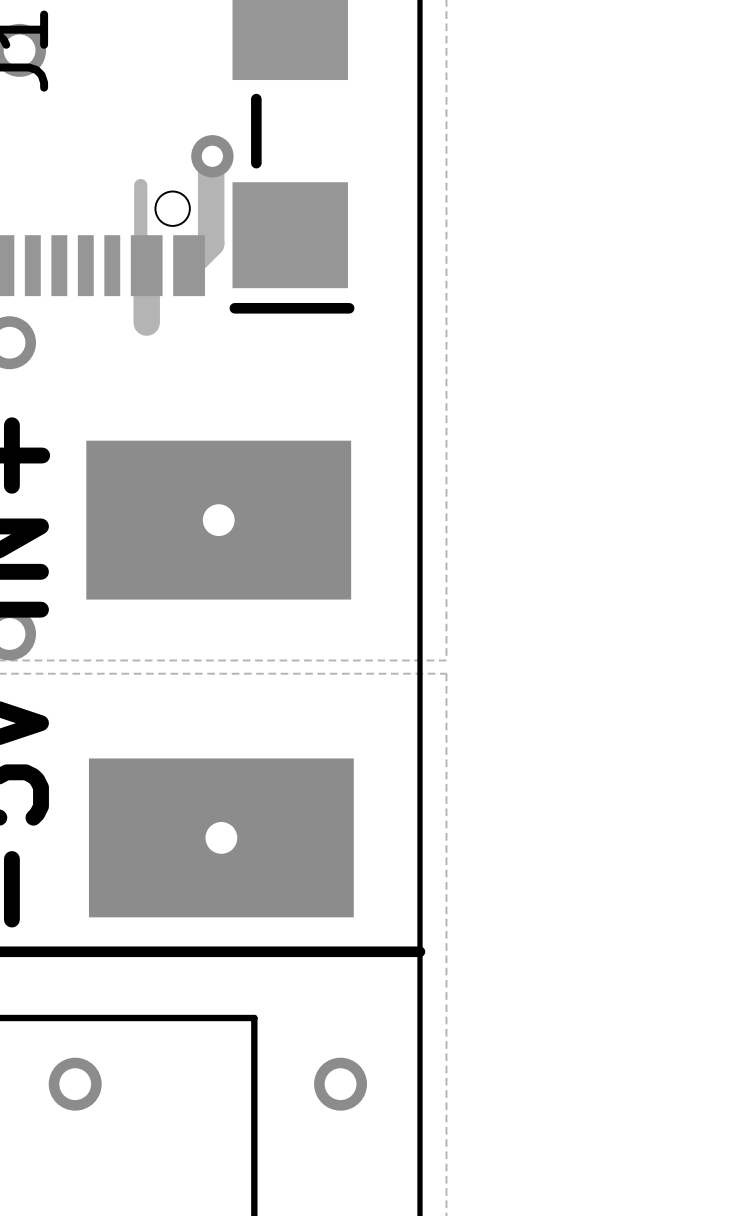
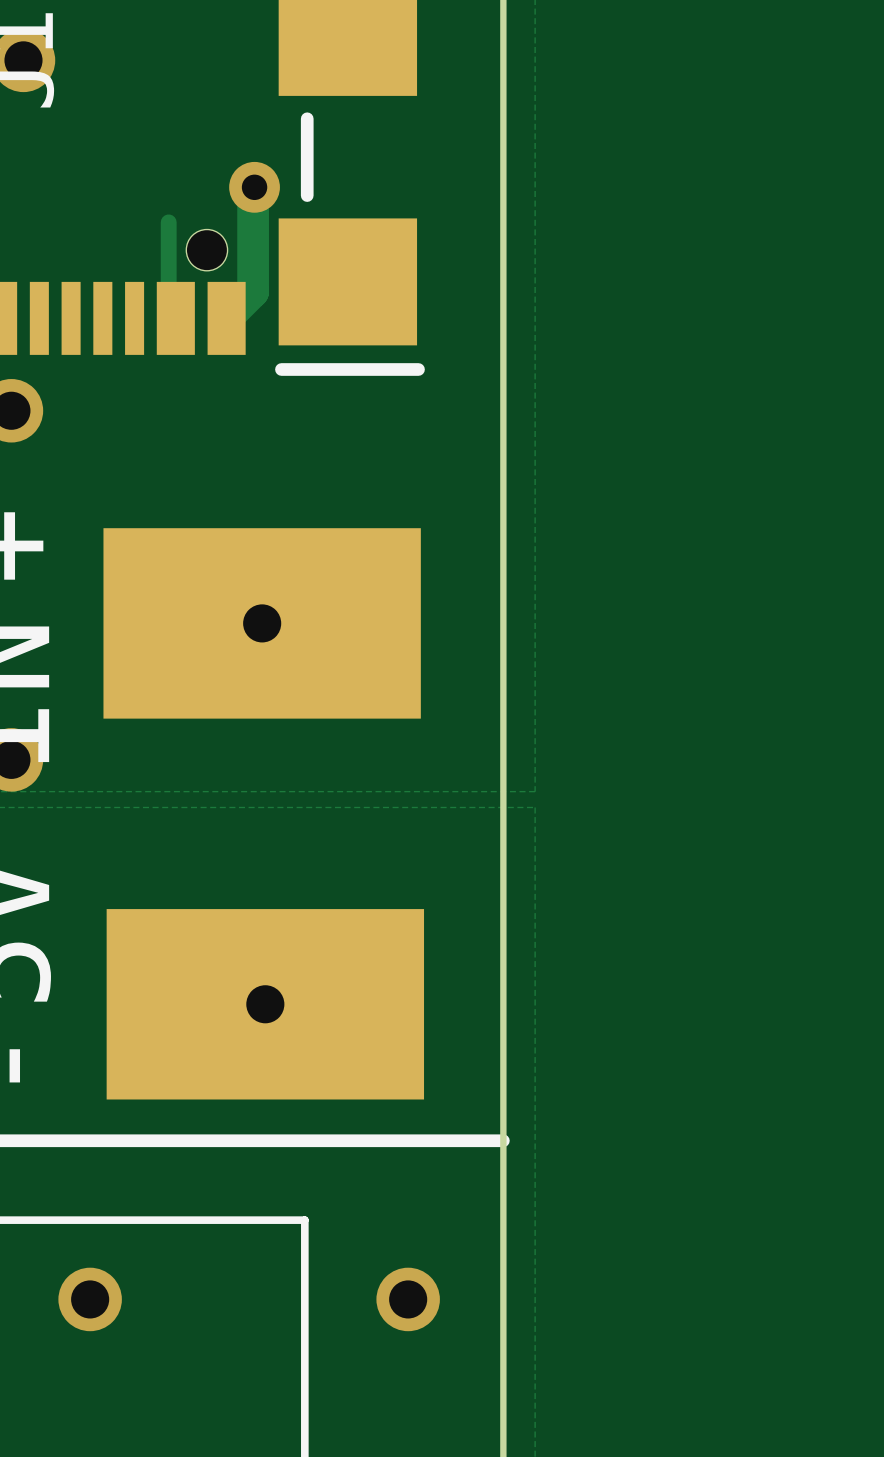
track: (146, 265) (146, 322) -> none

